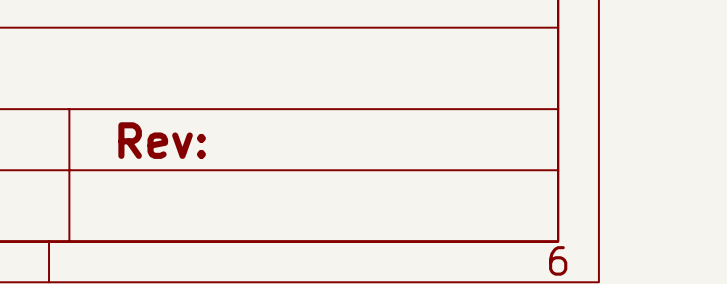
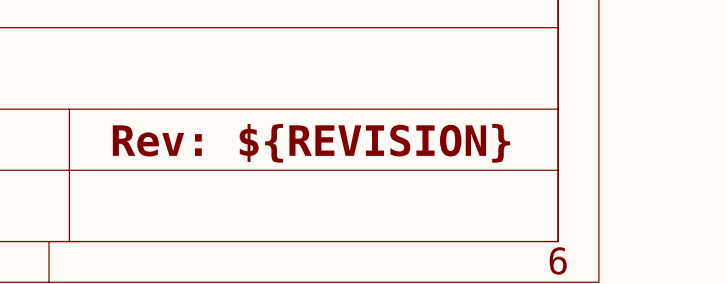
title block: Rev: (162, 140) -> Rev: ${REVISION} (311, 143)

